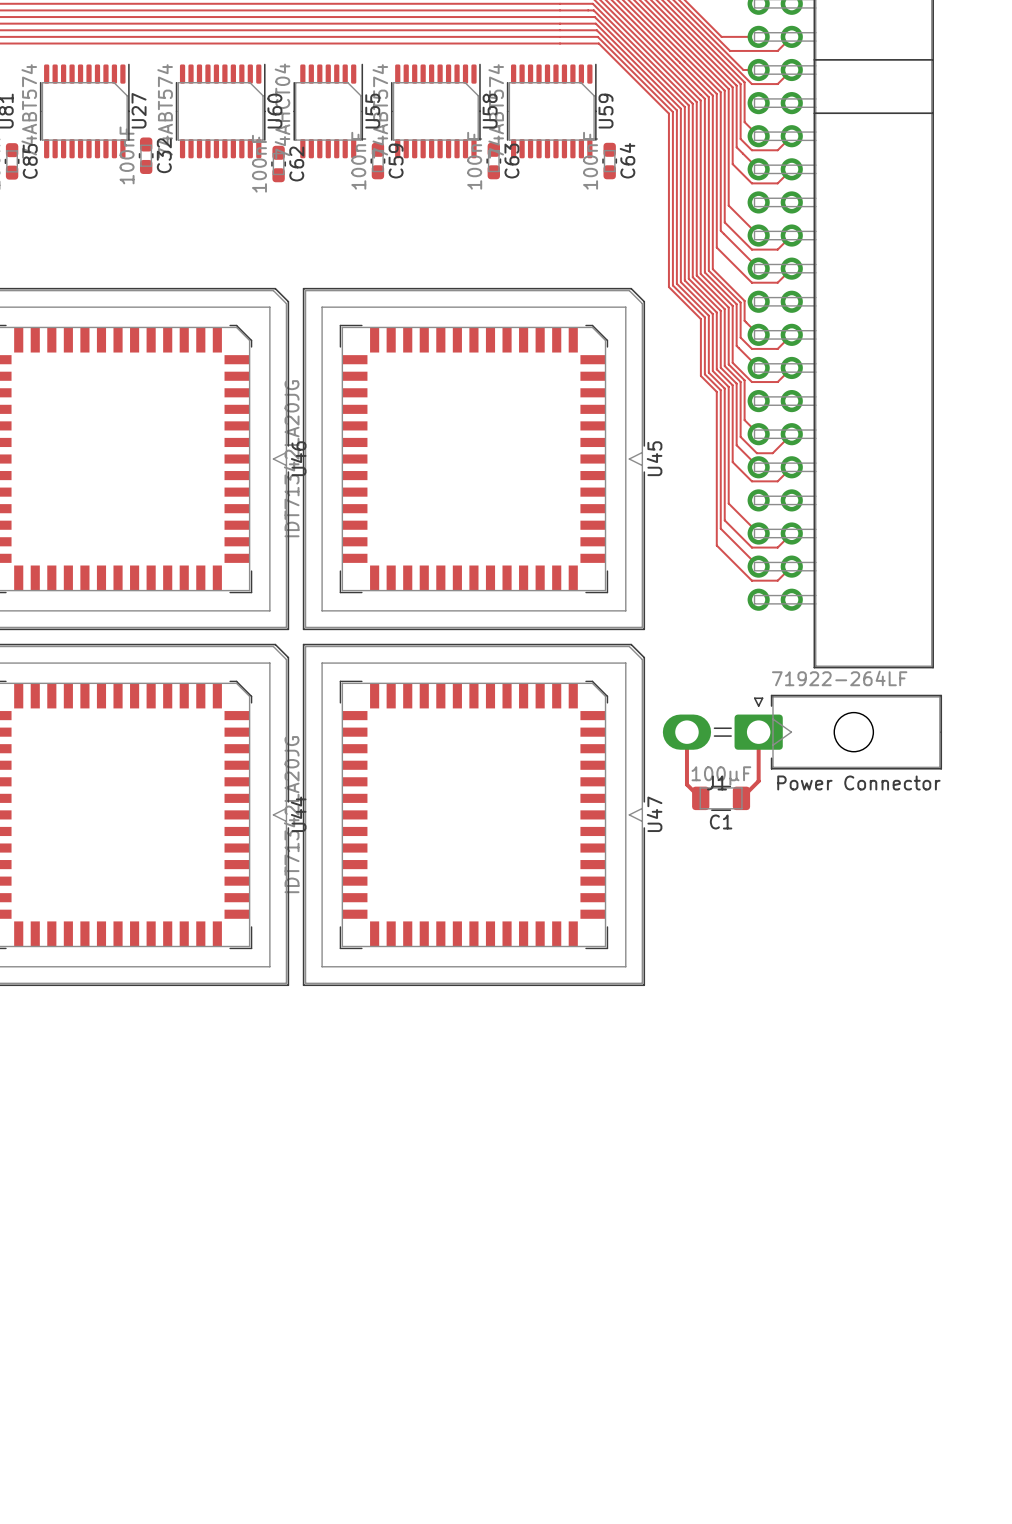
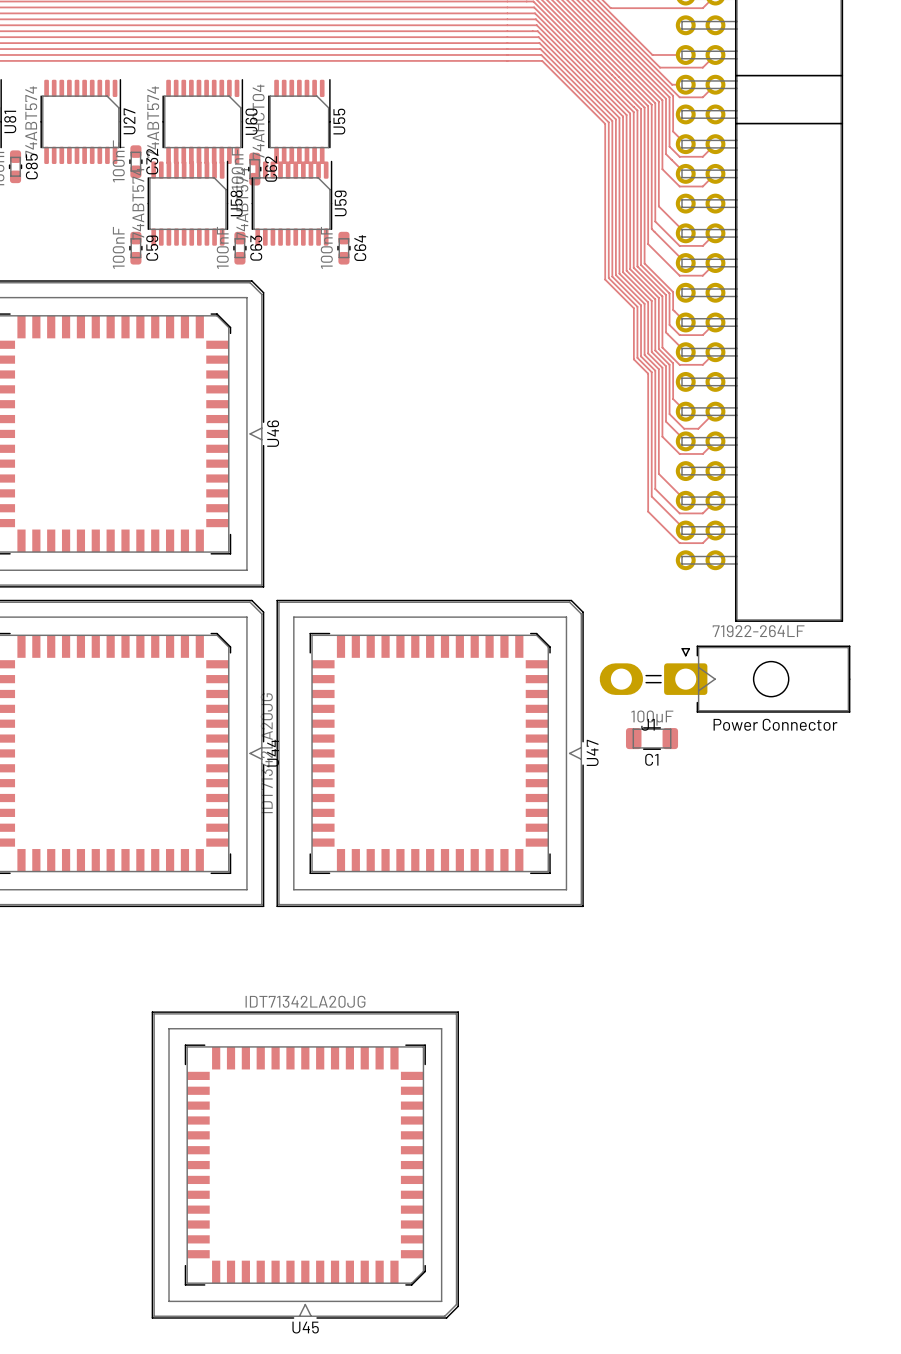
U58 position: (435, 110) -> (187, 203)
U59 position: (551, 110) -> (291, 203)
C59 position: (377, 161) -> (135, 248)
C63 position: (493, 161) -> (239, 248)
C64 position: (609, 161) -> (343, 248)
U45 rotation: 0° (473, 459) -> 90° clockwise (305, 1165)
U45 position: (473, 459) -> (305, 1165)
track: (686, 732) (686, 784) (700, 798) -> none
track: (758, 732) (758, 781) (741, 798) -> none

